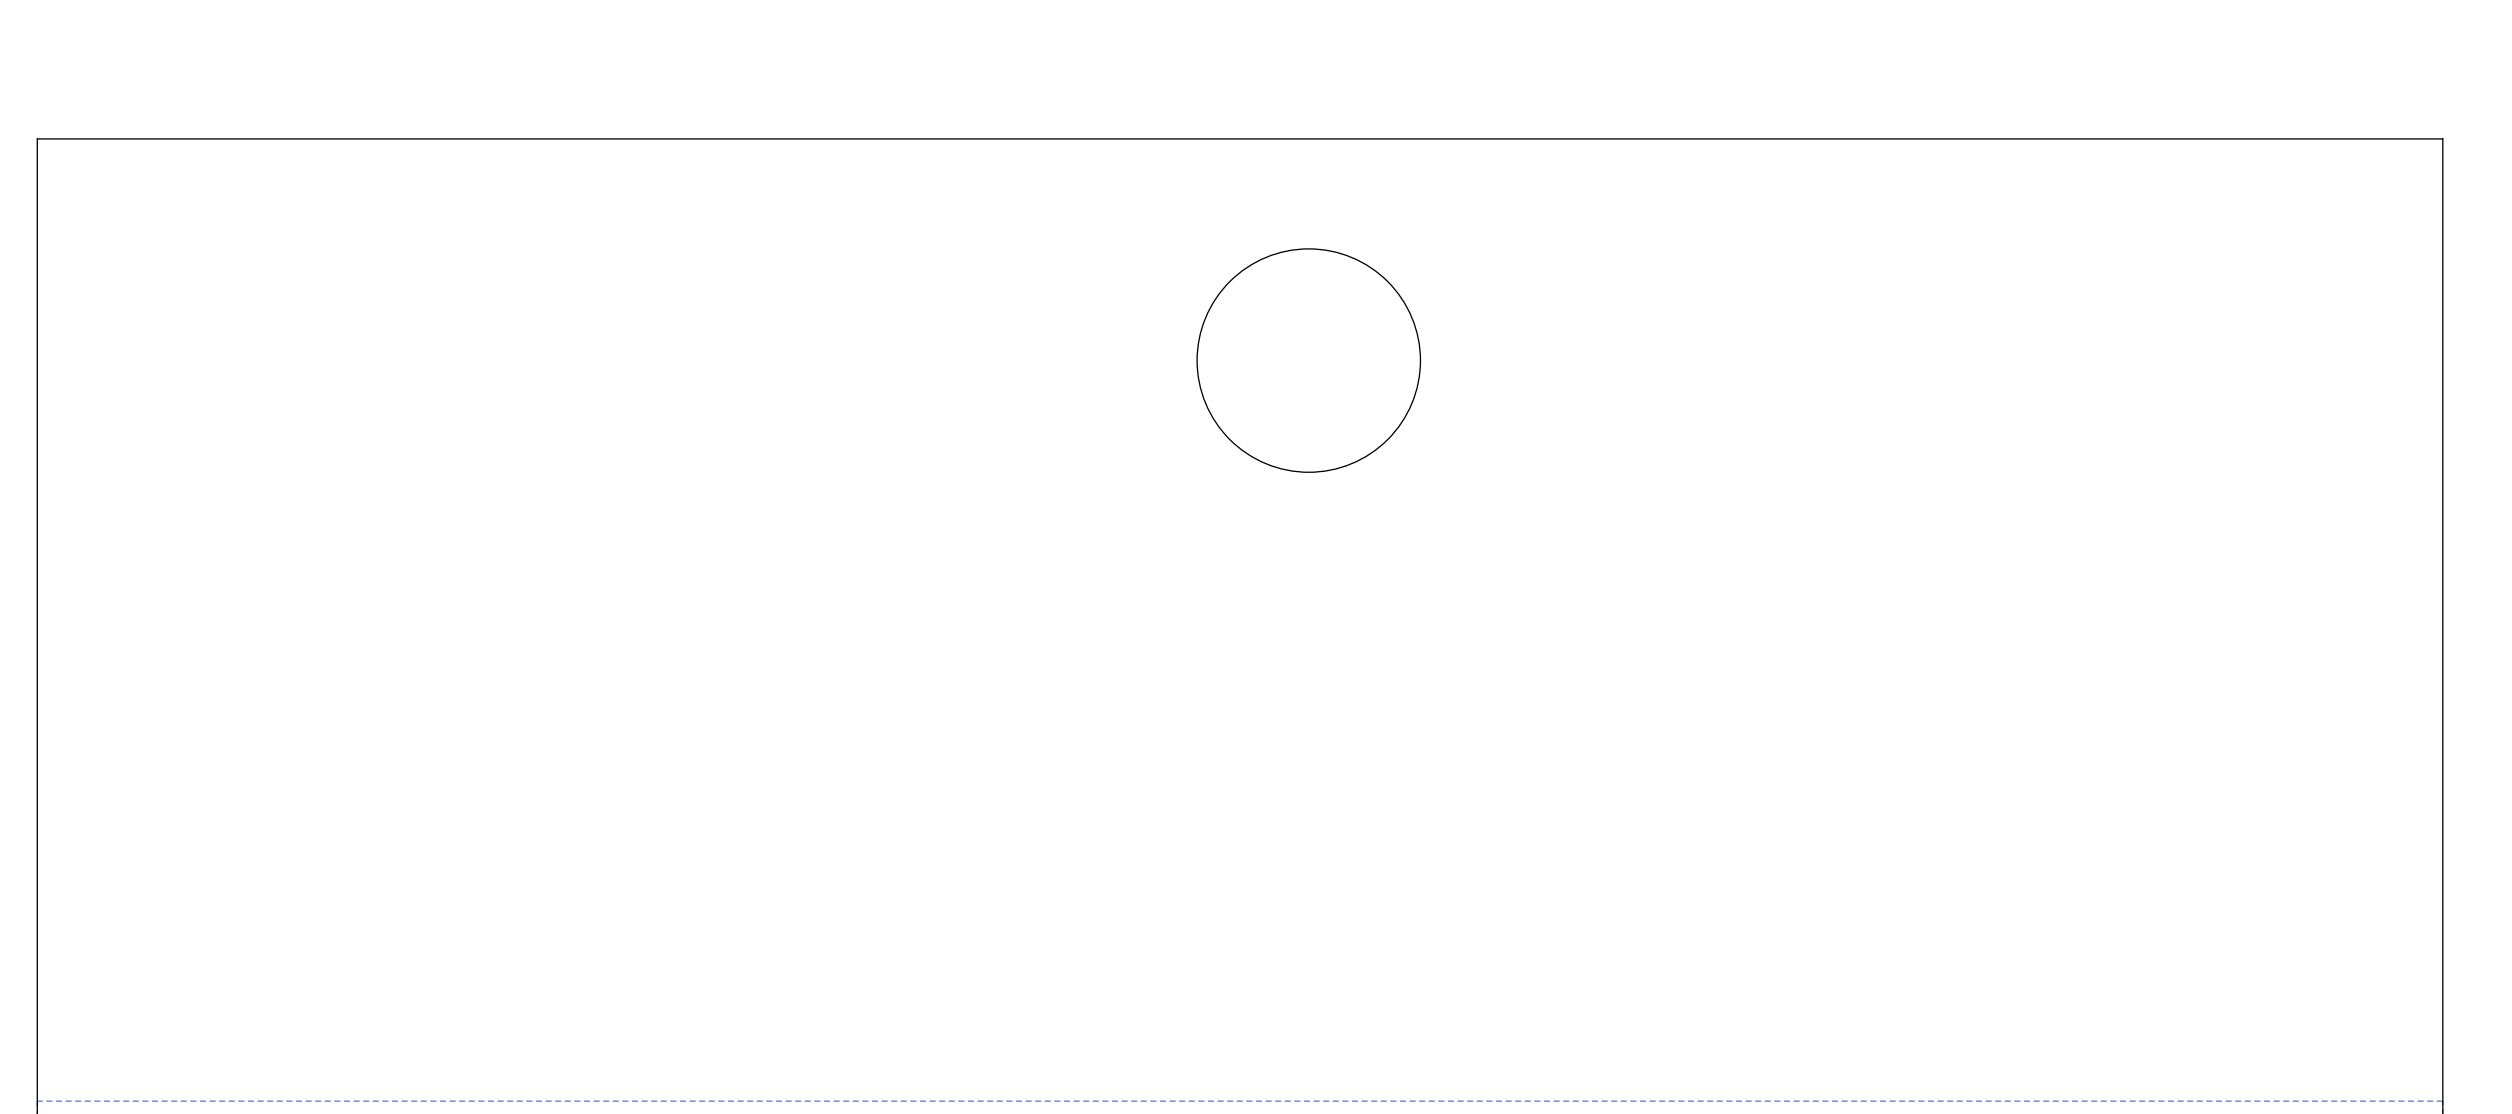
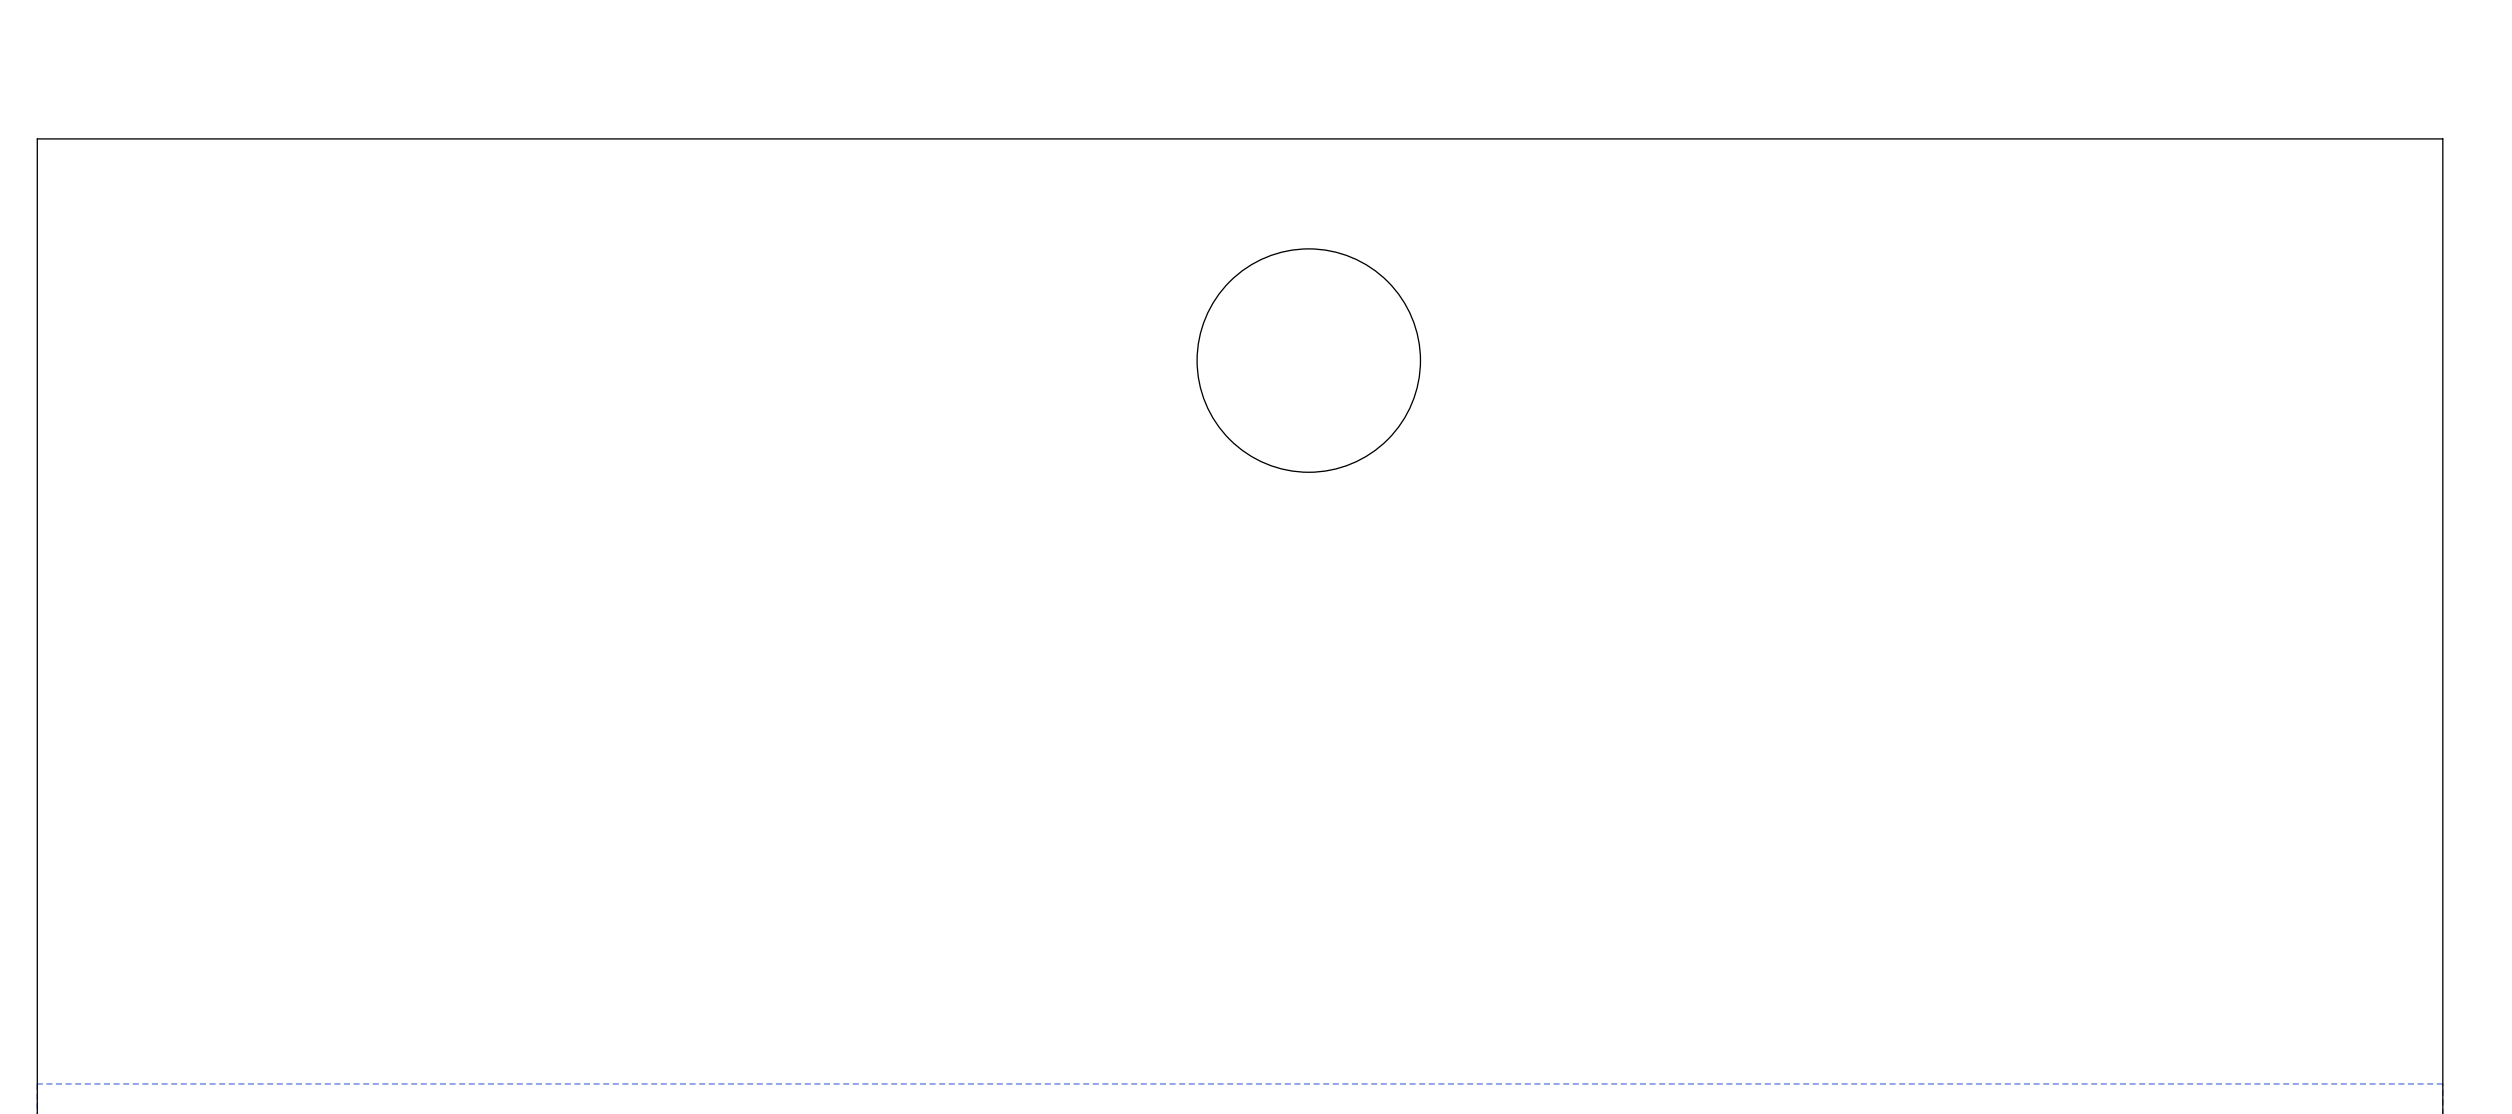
zone outline: (2442, 1101) (37, 1101) -> (2442, 1101) (2442, 1083) (37, 1083) (37, 1101)

